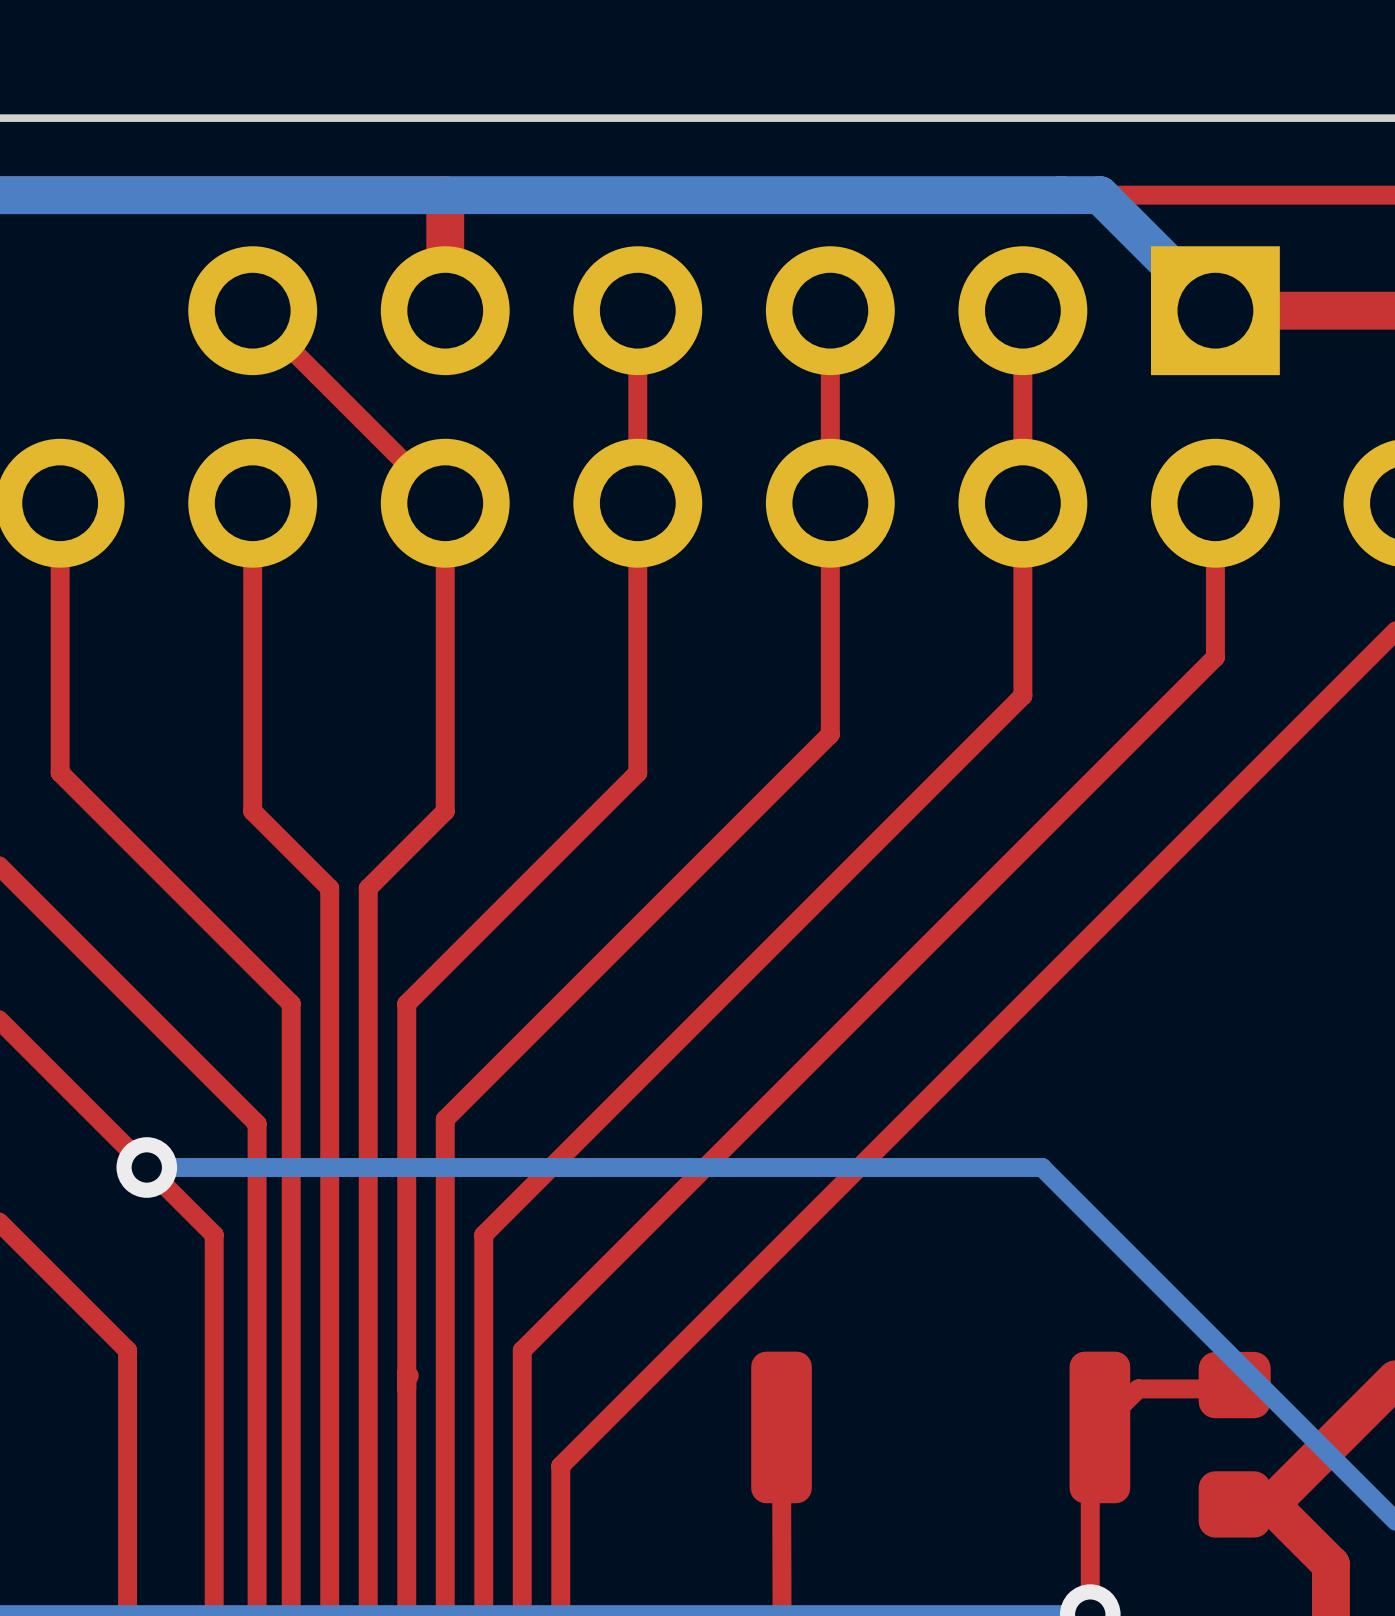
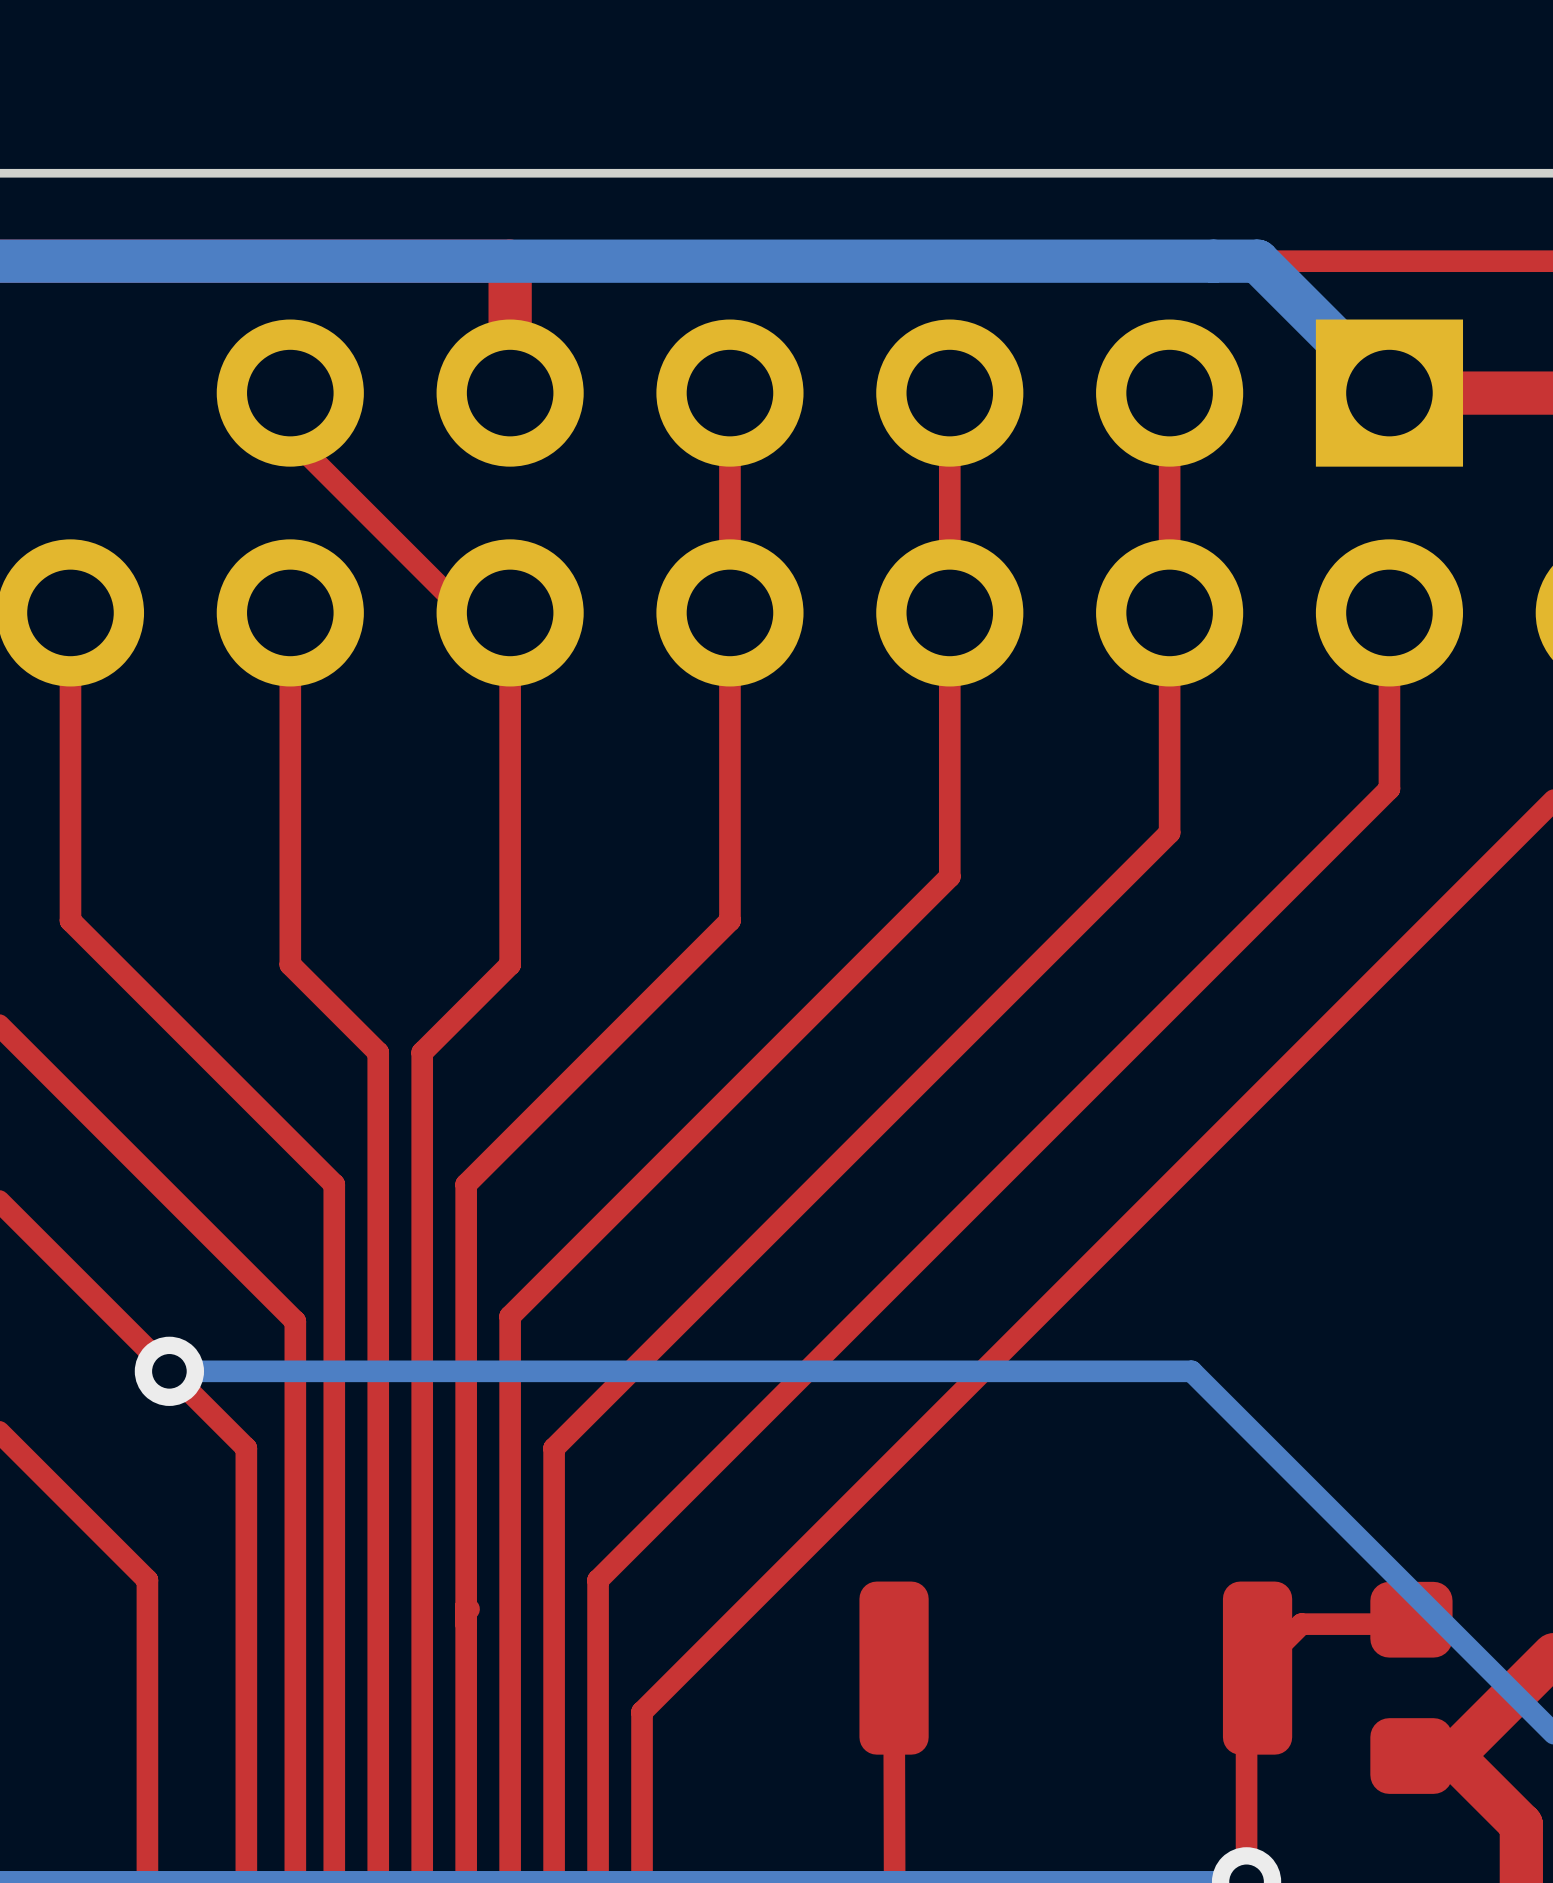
top track: (252, 310) (445, 503) -> (246, 393) (466, 612)

